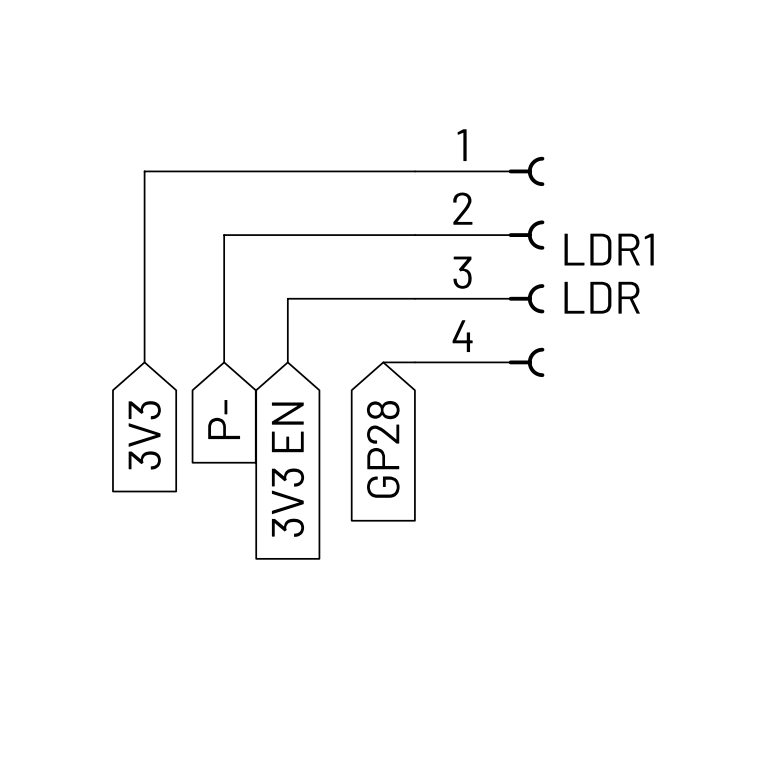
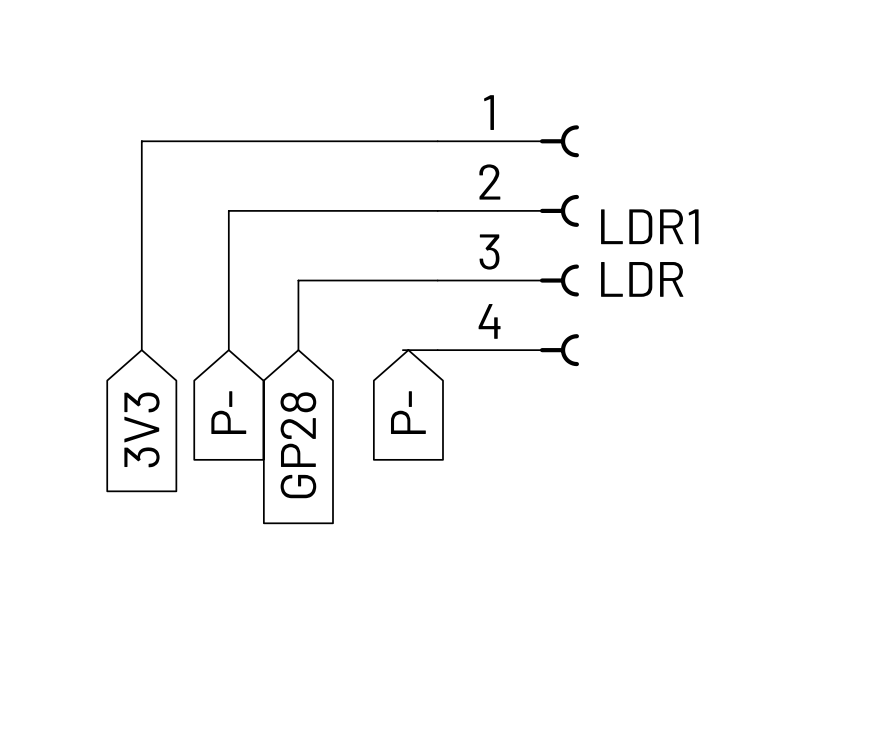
global label: GP28 (383, 449) -> P- (408, 412)
global label: 3V3 EN (288, 469) -> GP28 (298, 445)

